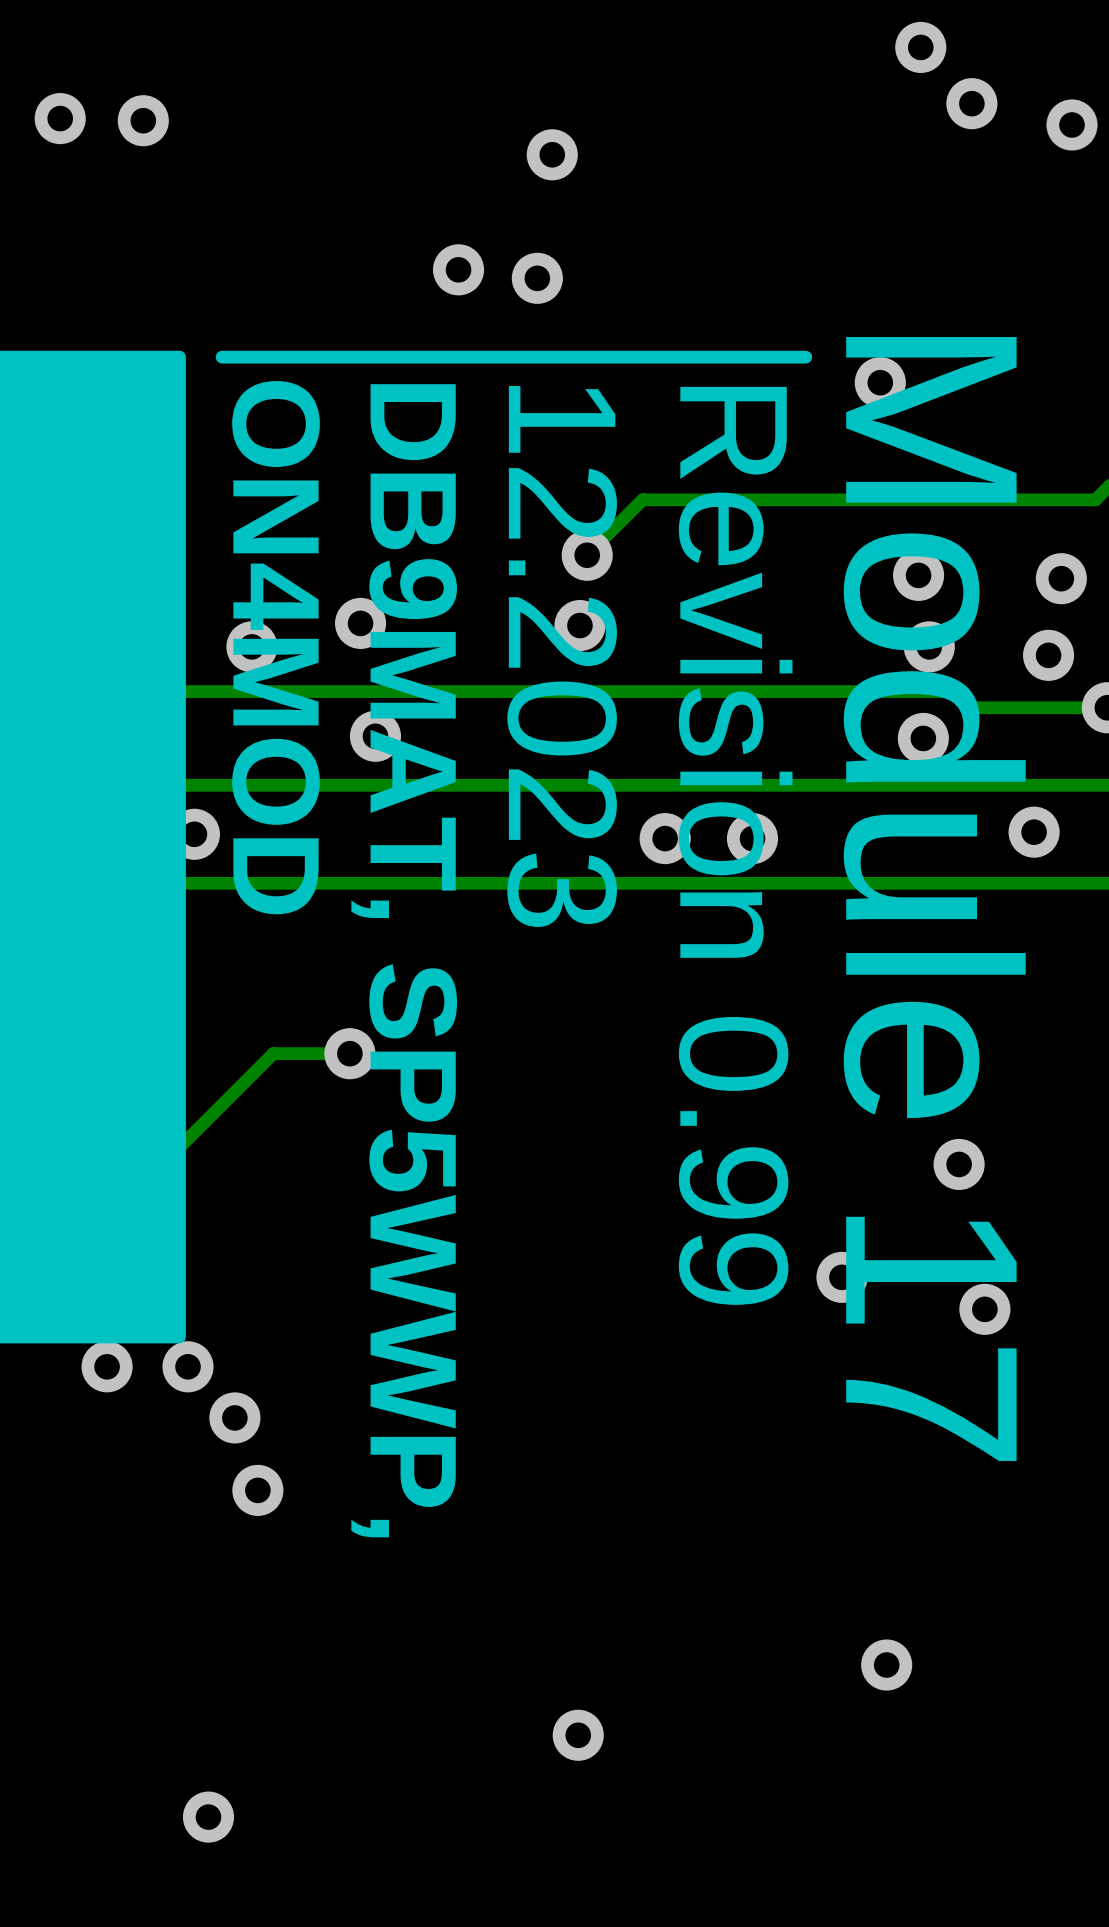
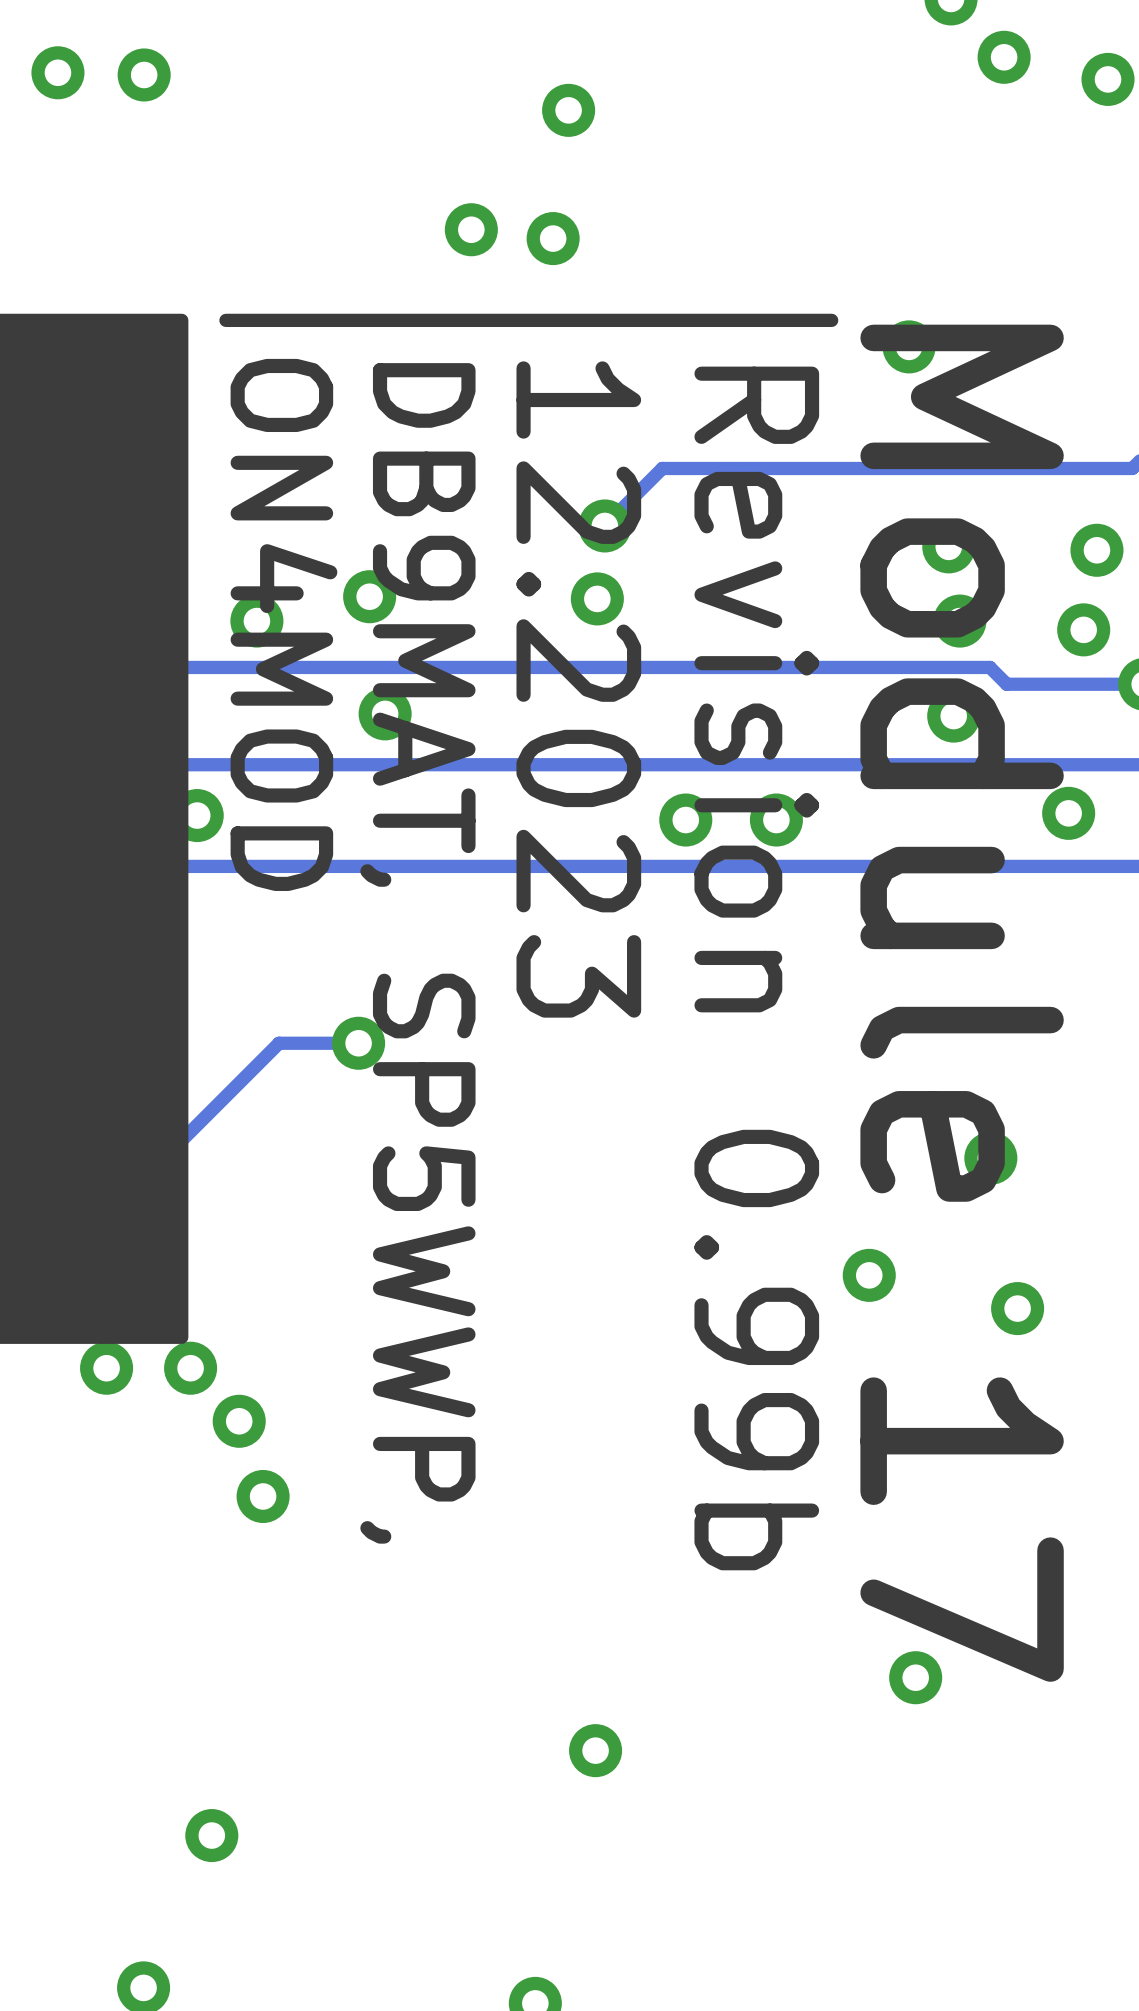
text: Revision 0.99 (735, 845) -> Revision 0.99b (756, 968)

